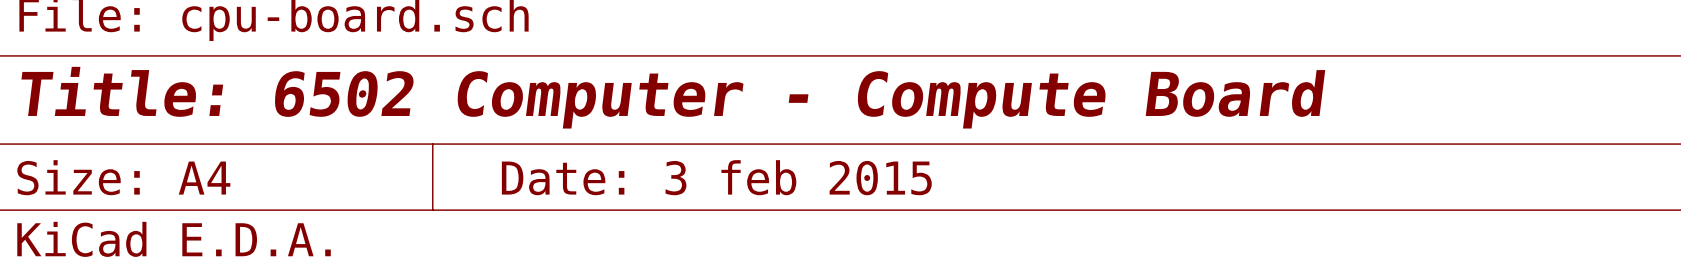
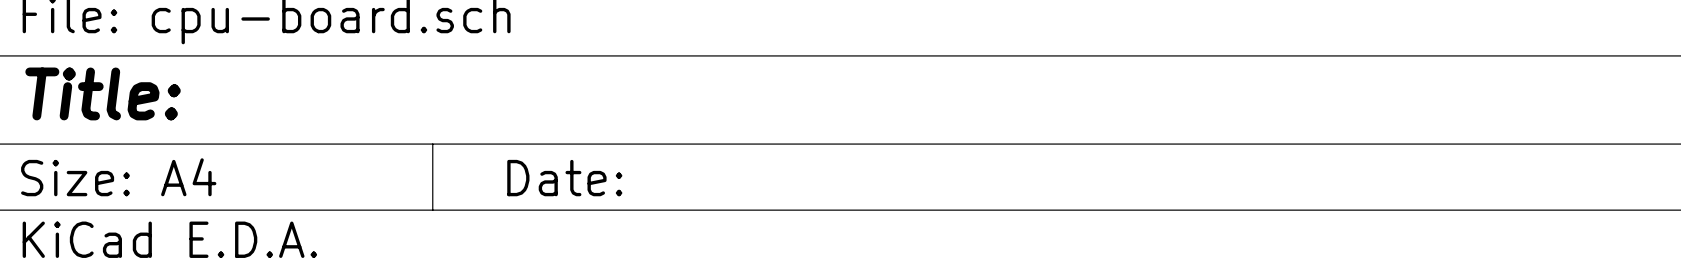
title block: Title: 6502 Computer - Compute Board (673, 97) -> Title: (103, 93)
title block: Date: 3 feb 2015 (716, 177) -> Date: (564, 178)

